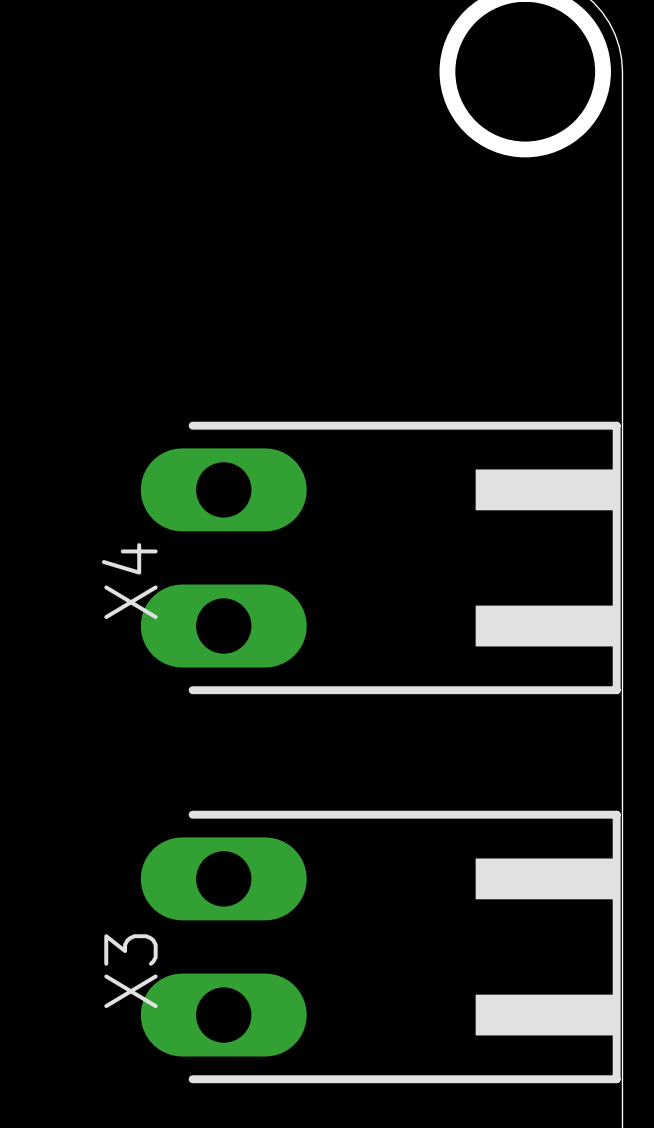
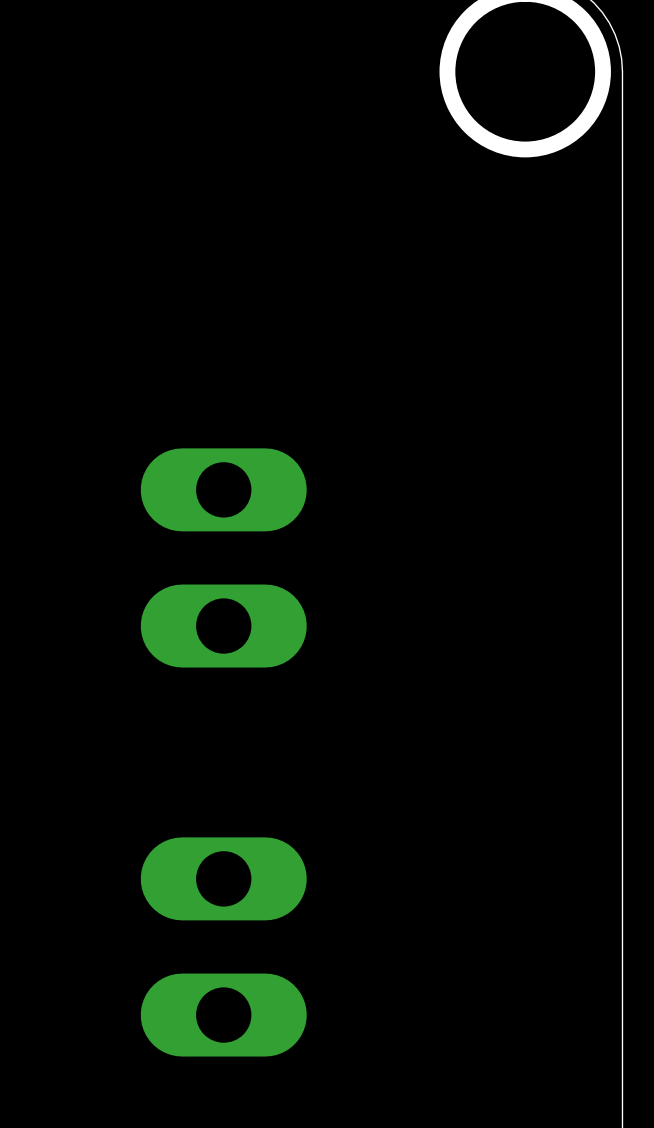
X4 side: bottom (380, 557) -> top (223, 557)
X3 side: bottom (380, 946) -> top (223, 946)

